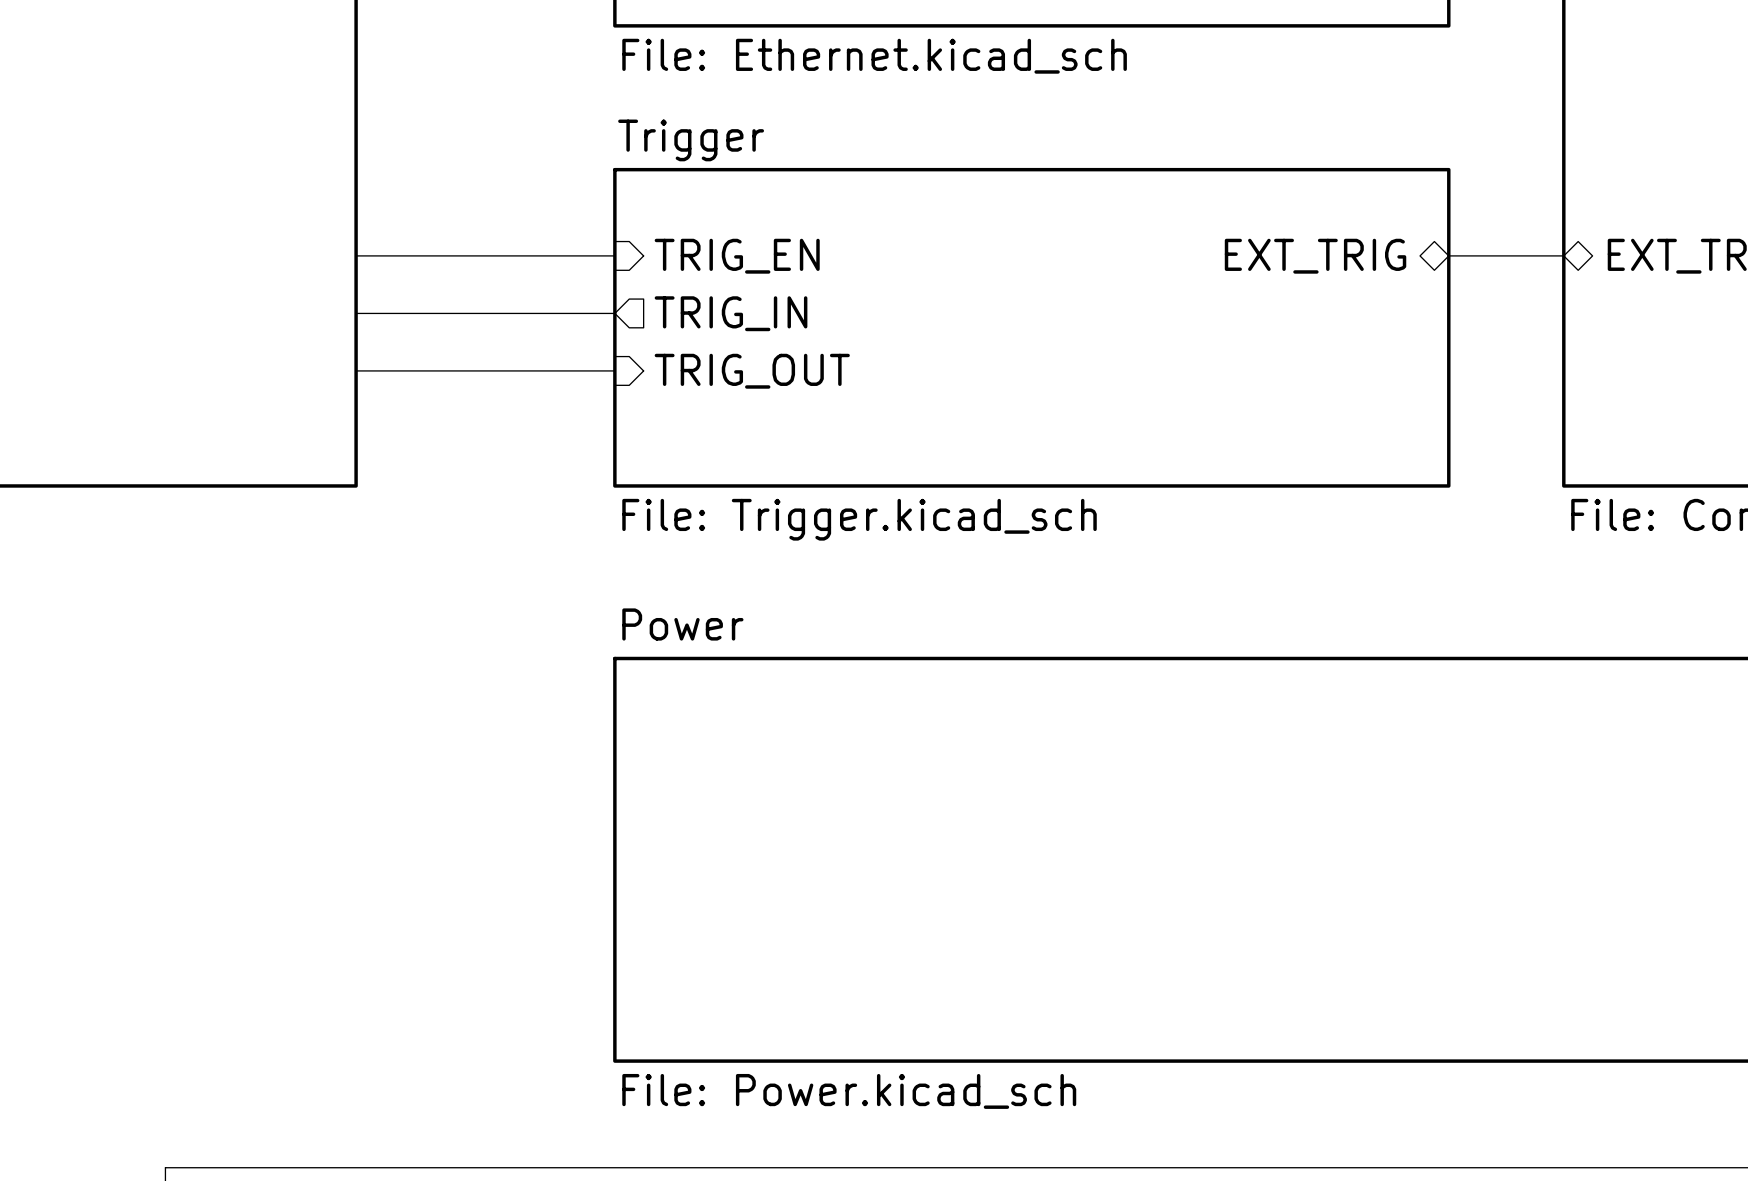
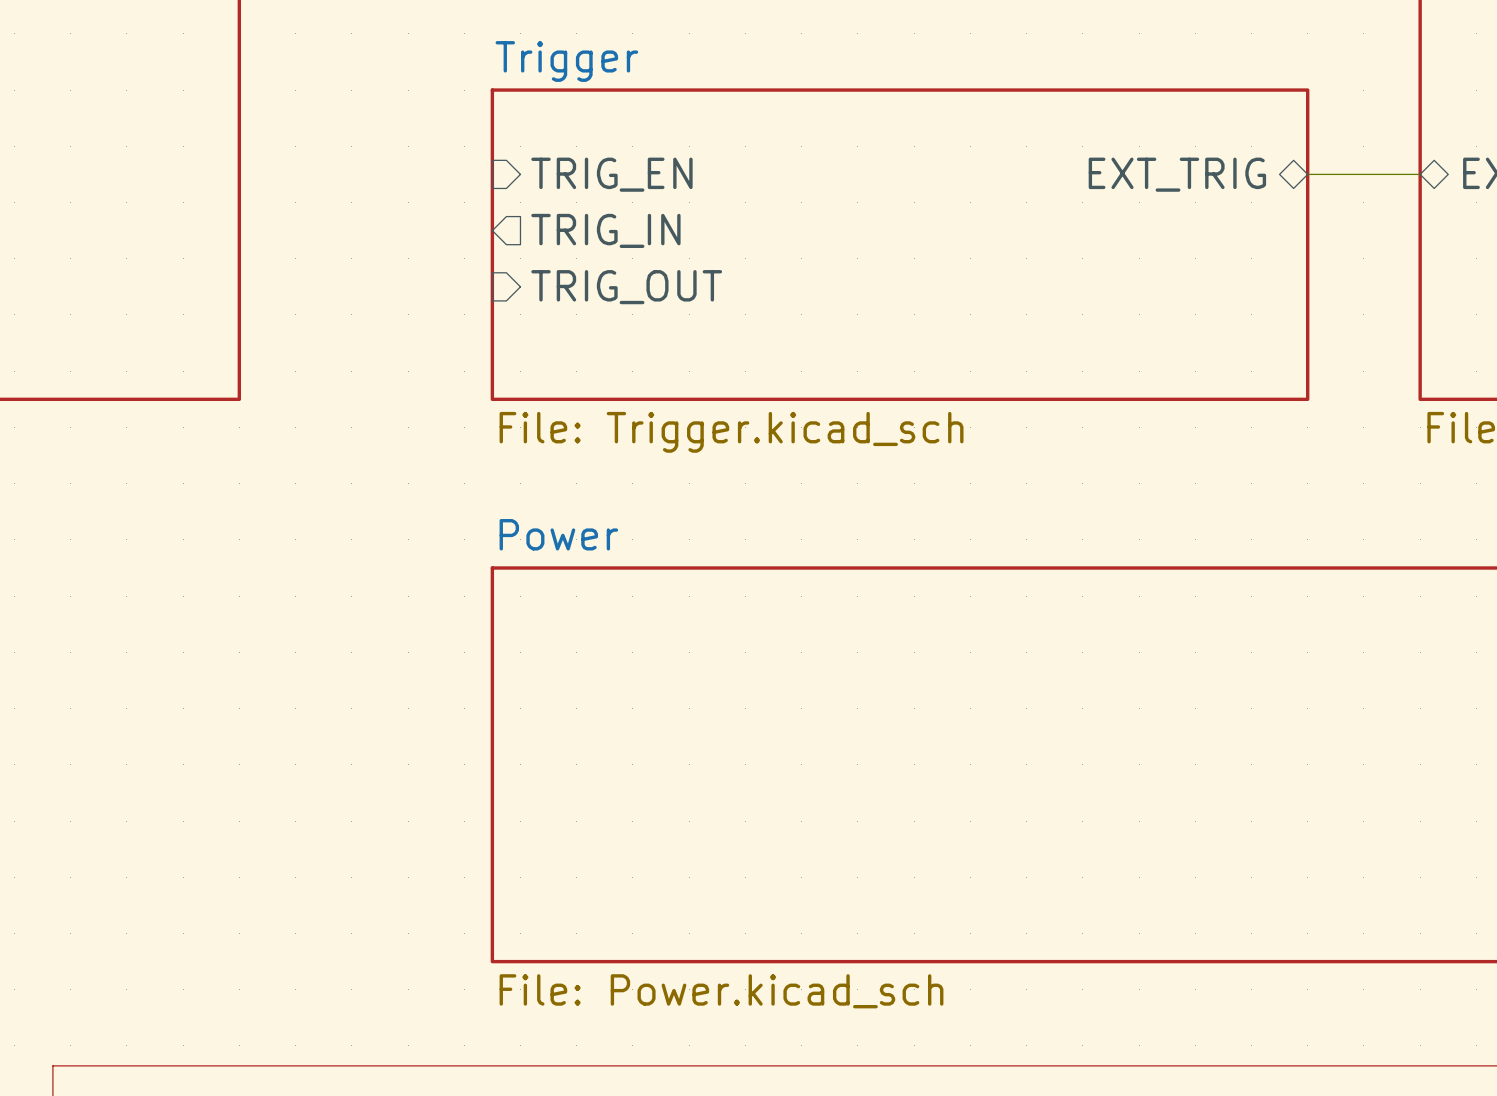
wire: (356, 255) (614, 255) -> none
wire: (356, 313) (614, 313) -> none
wire: (356, 370) (614, 370) -> none

